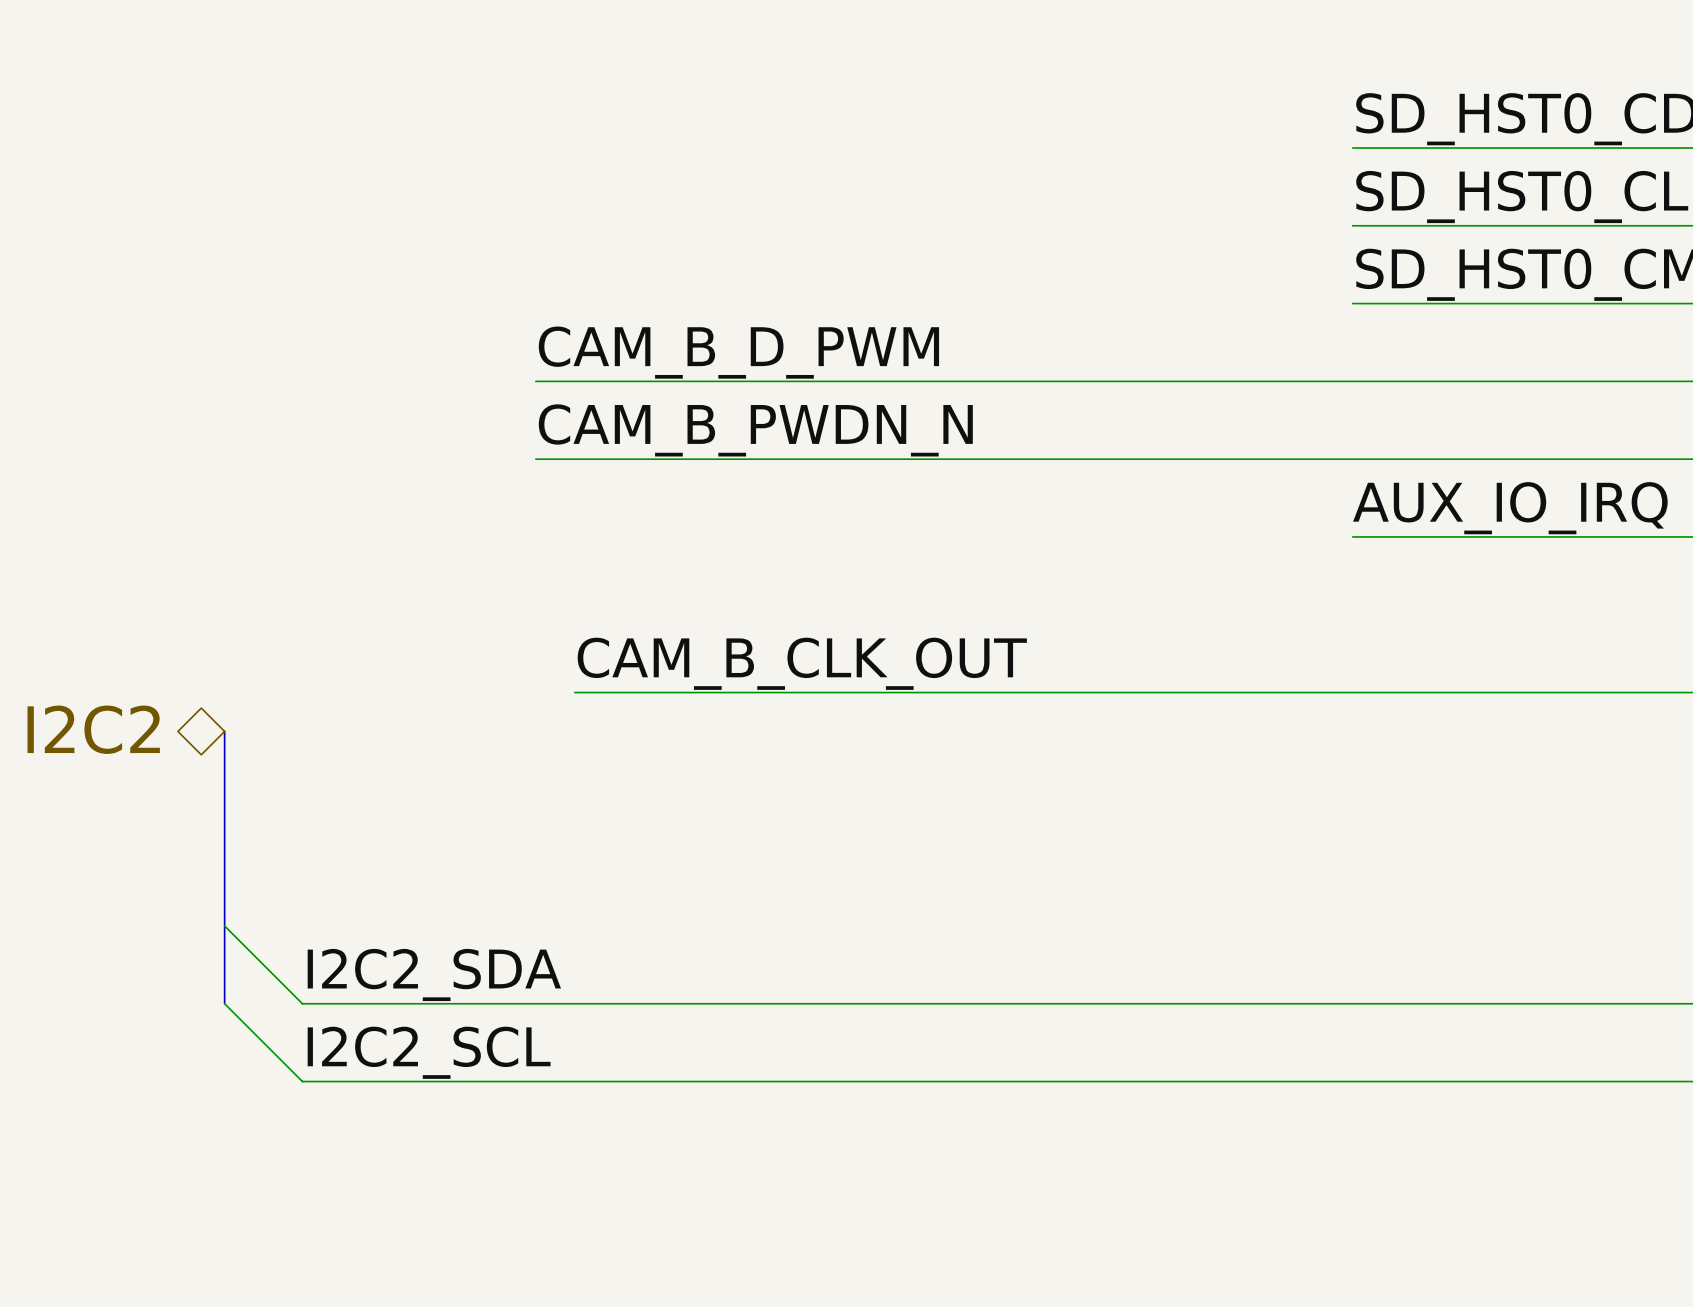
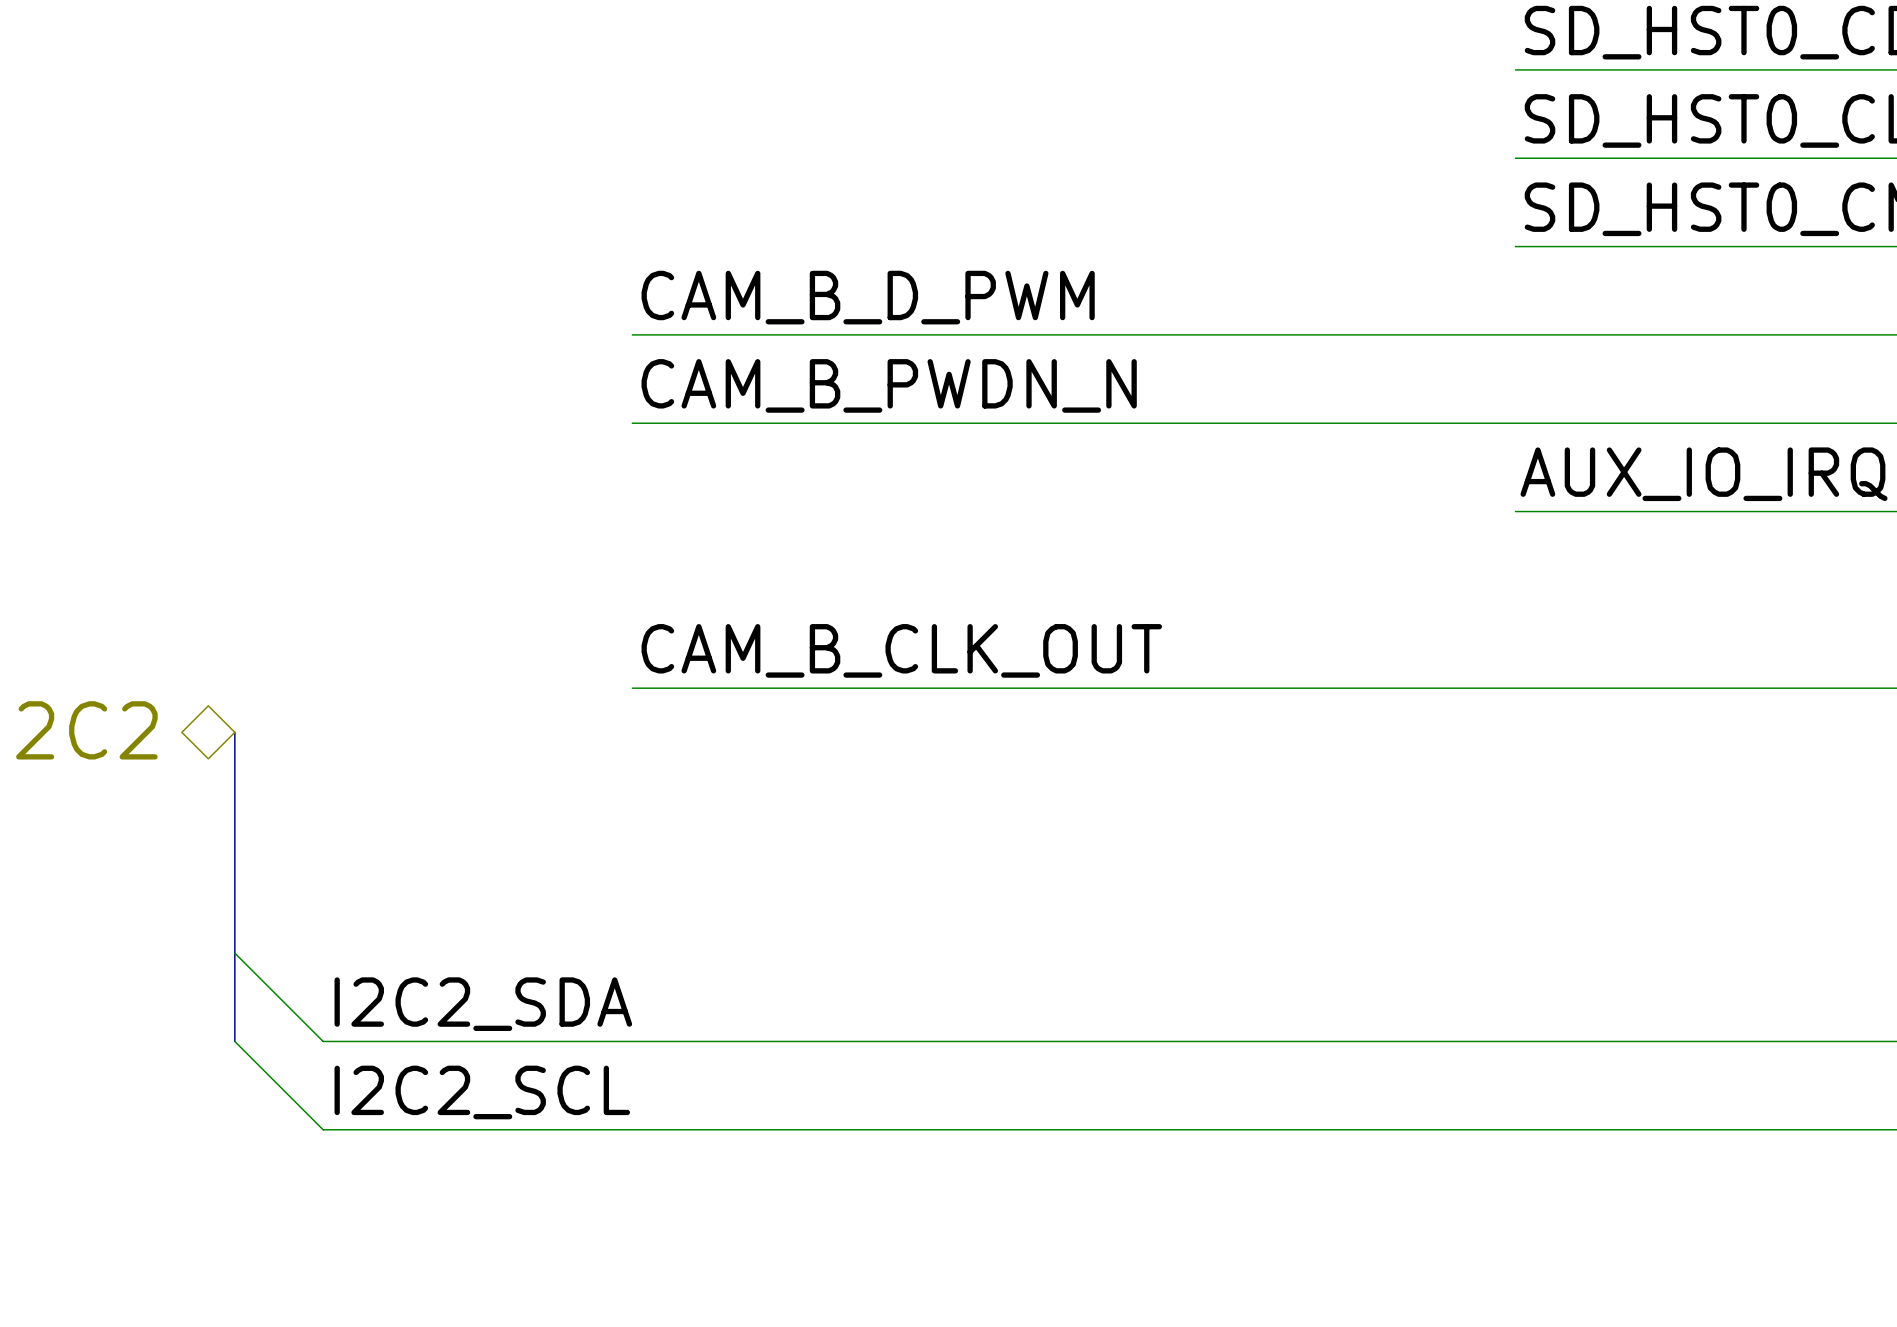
label position: CAM_B_D_PWM (738, 352) -> CAM_B_D_PWM (868, 297)
wire: (535, 381) (574, 381) -> none
label position: CAM_B_PWDN_N (755, 430) -> CAM_B_PWDN_N (889, 385)
wire: (535, 459) (574, 459) -> none

